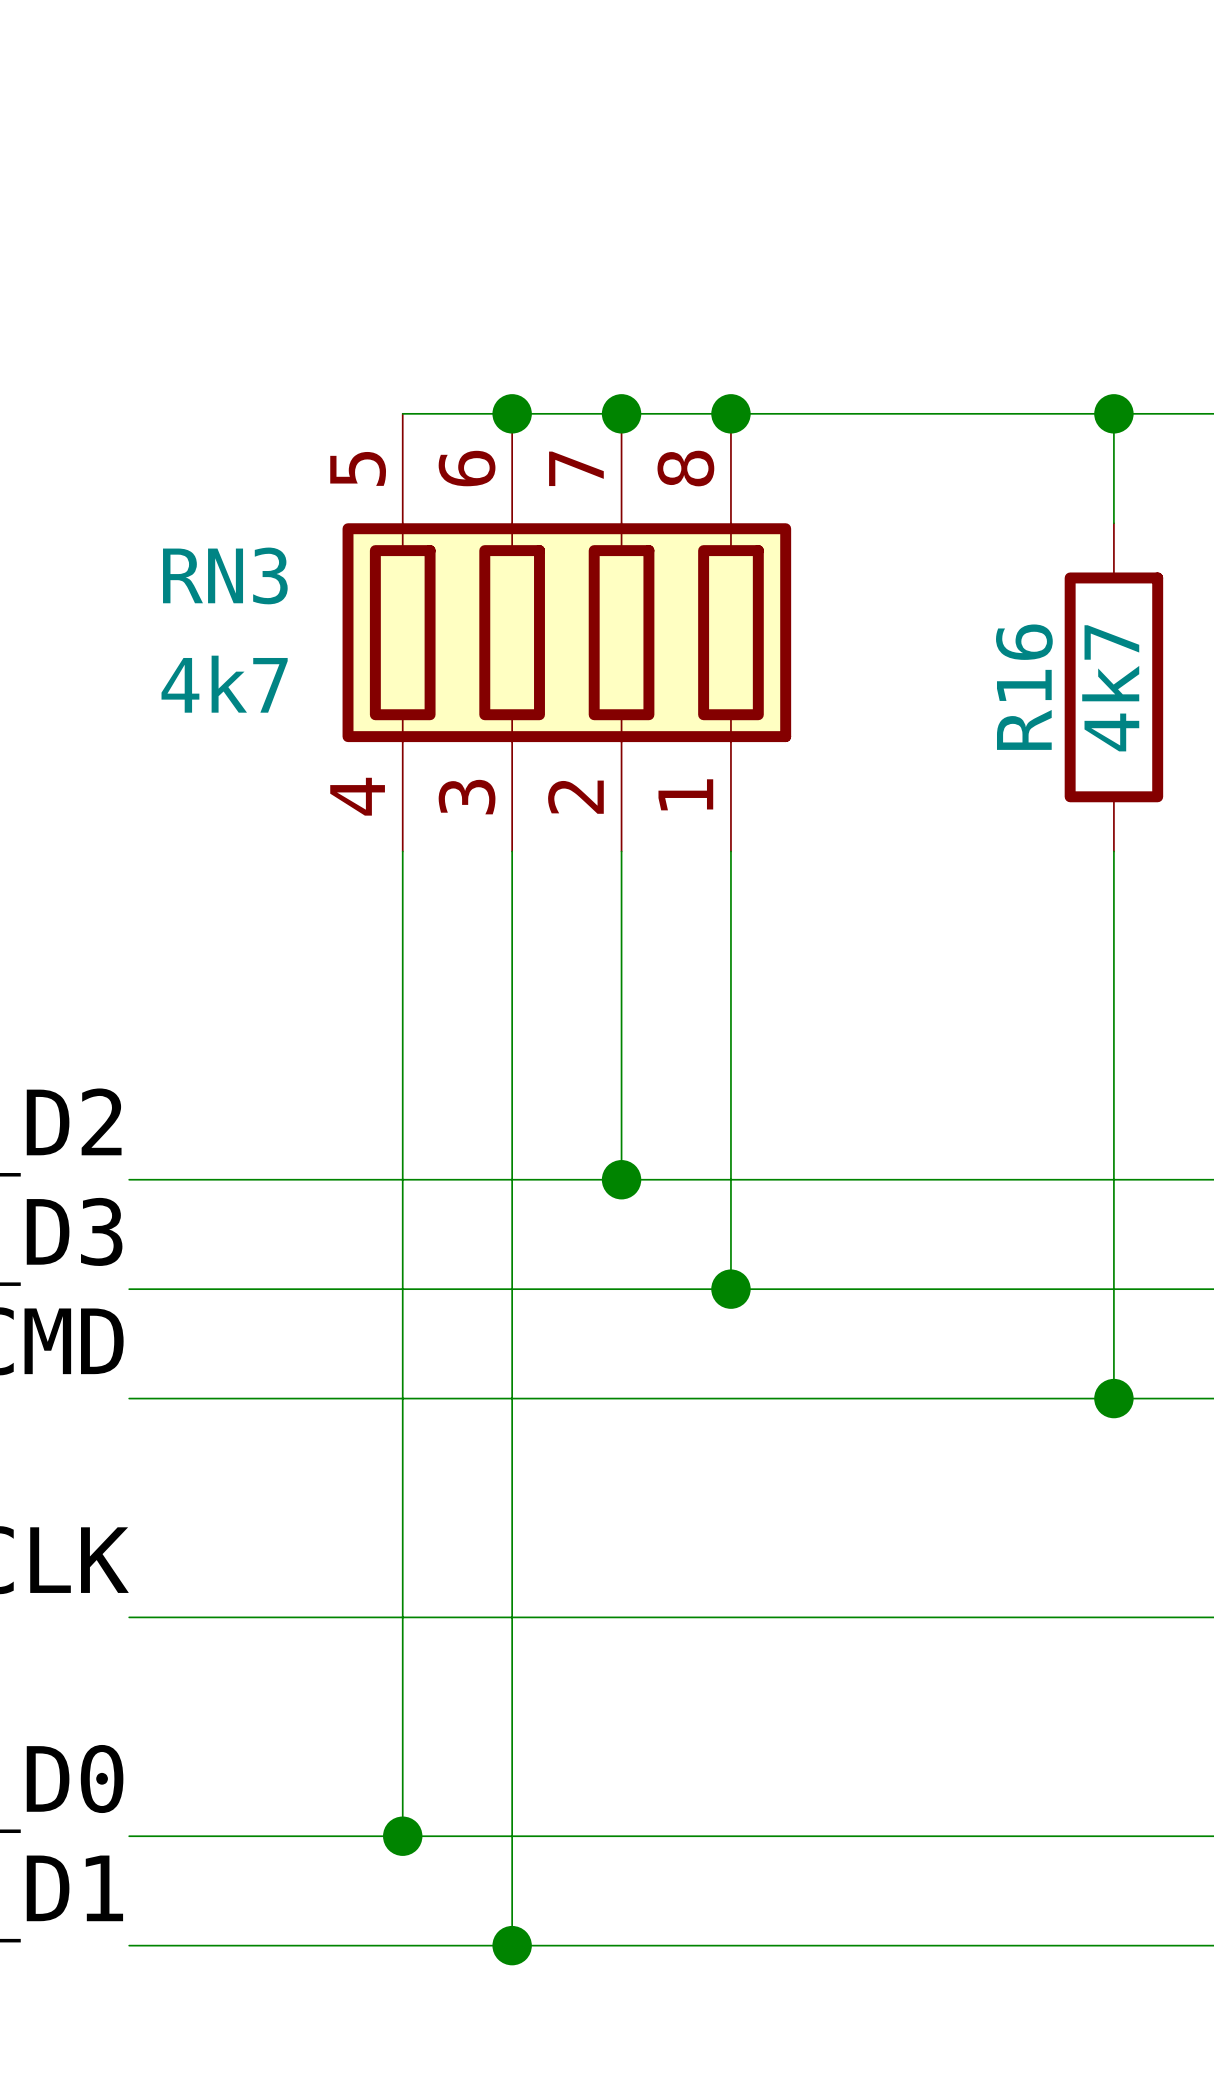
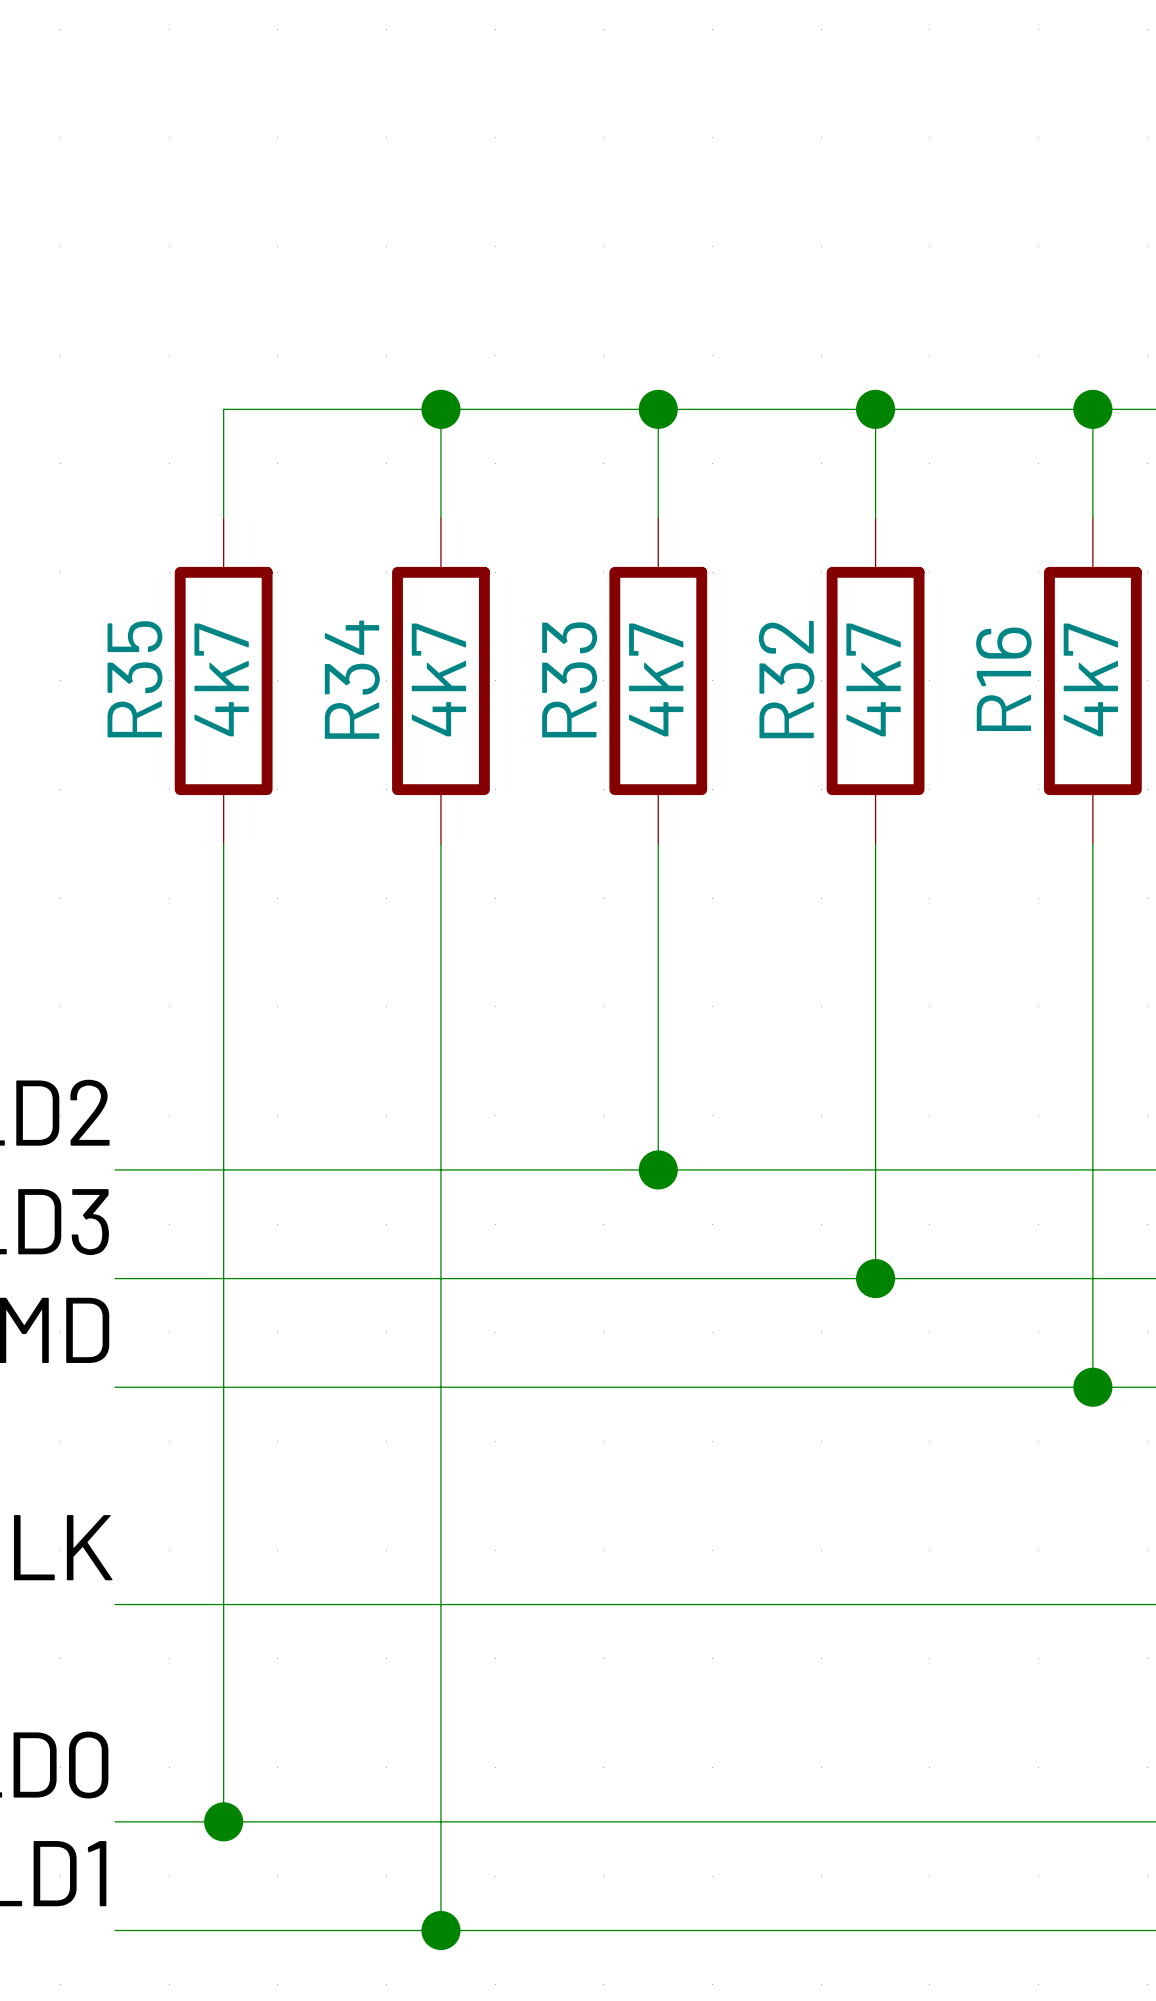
wire: none -> (386, 409) (223, 409) (223, 518)
wire: none -> (440, 409) (440, 518)
junction position: (512, 413) -> (440, 409)
junction: (621, 413) -> none
wire: none -> (658, 409) (658, 518)
junction: none -> (658, 409)
junction: (730, 413) -> none
wire: none -> (875, 409) (875, 518)
junction: none -> (875, 409)
RN3: 4k7 (566, 632) -> none
R35: none -> 4k7 (223, 680)
R34: none -> 4k7 (440, 680)
R33: none -> 4k7 (658, 680)
R32: none -> 4k7 (875, 680)
wire: (402, 851) (402, 1836) -> (223, 843) (223, 1821)
wire: (512, 851) (512, 1945) -> (440, 843) (440, 1930)
wire: (621, 851) (621, 1179) -> (658, 843) (658, 1169)
wire: (730, 851) (730, 1289) -> (875, 843) (875, 1278)
junction position: (621, 1179) -> (658, 1169)
junction: (730, 1289) -> none
junction: none -> (875, 1278)
junction: none -> (223, 1821)
junction: (402, 1836) -> none
junction position: (512, 1945) -> (440, 1930)

